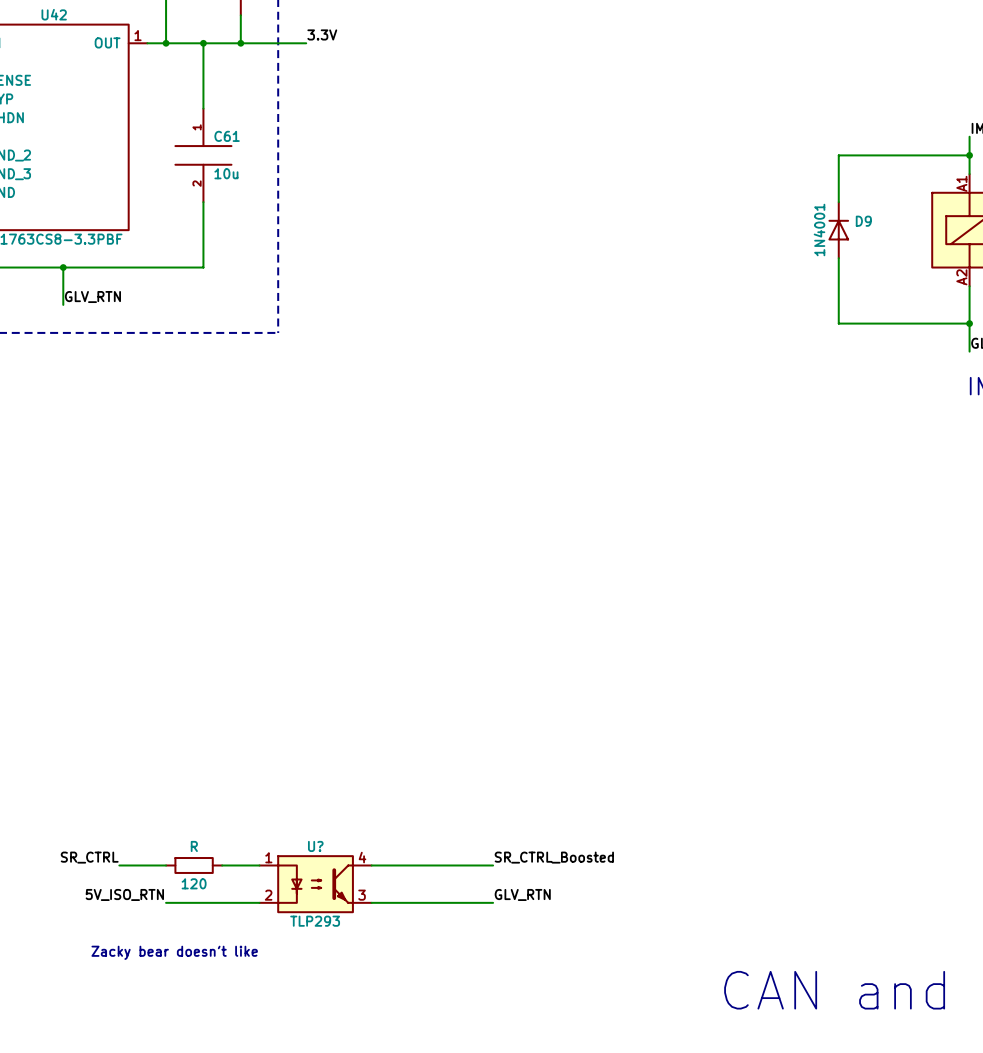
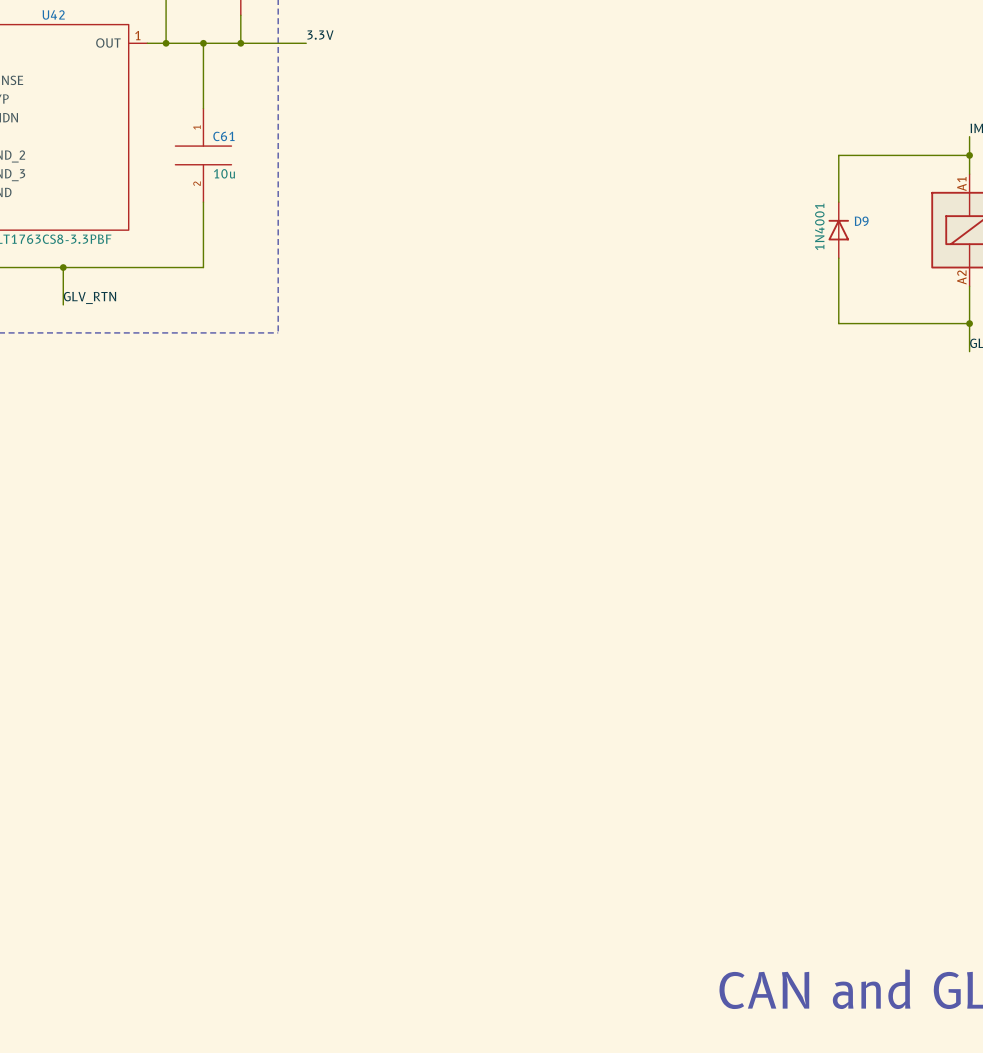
label: SR_CTRL (89, 857) -> none
label: SR_CTRL_Boosted (554, 857) -> none
wire: (119, 865) (166, 865) -> none
R: 120 (194, 865) -> none
wire: (222, 865) (259, 865) -> none
wire: (371, 865) (493, 865) -> none
U?: TLP293 (315, 884) -> none
label: 5V_ISO_RTN (124, 894) -> none
label: GLV_RTN (522, 894) -> none
wire: (166, 902) (259, 902) -> none
wire: (371, 902) (493, 902) -> none
text: Zacky bear doesn't like (174, 952) -> none

